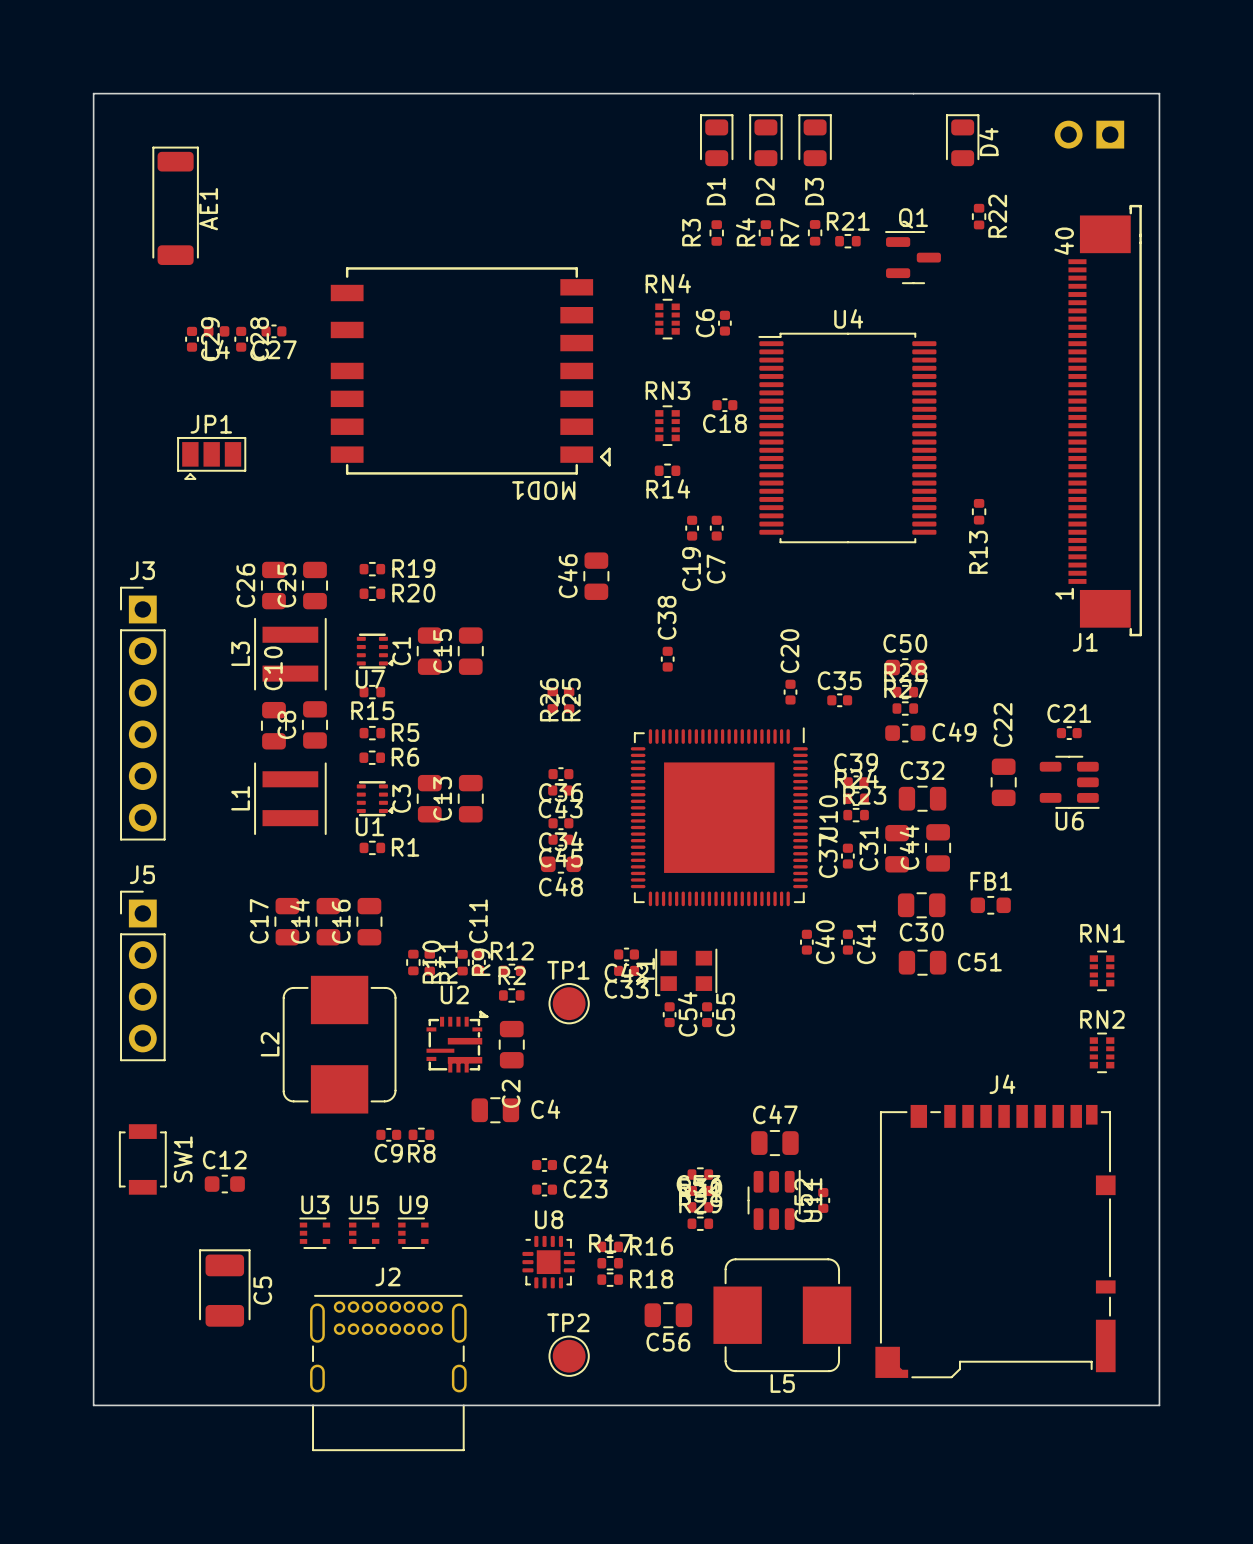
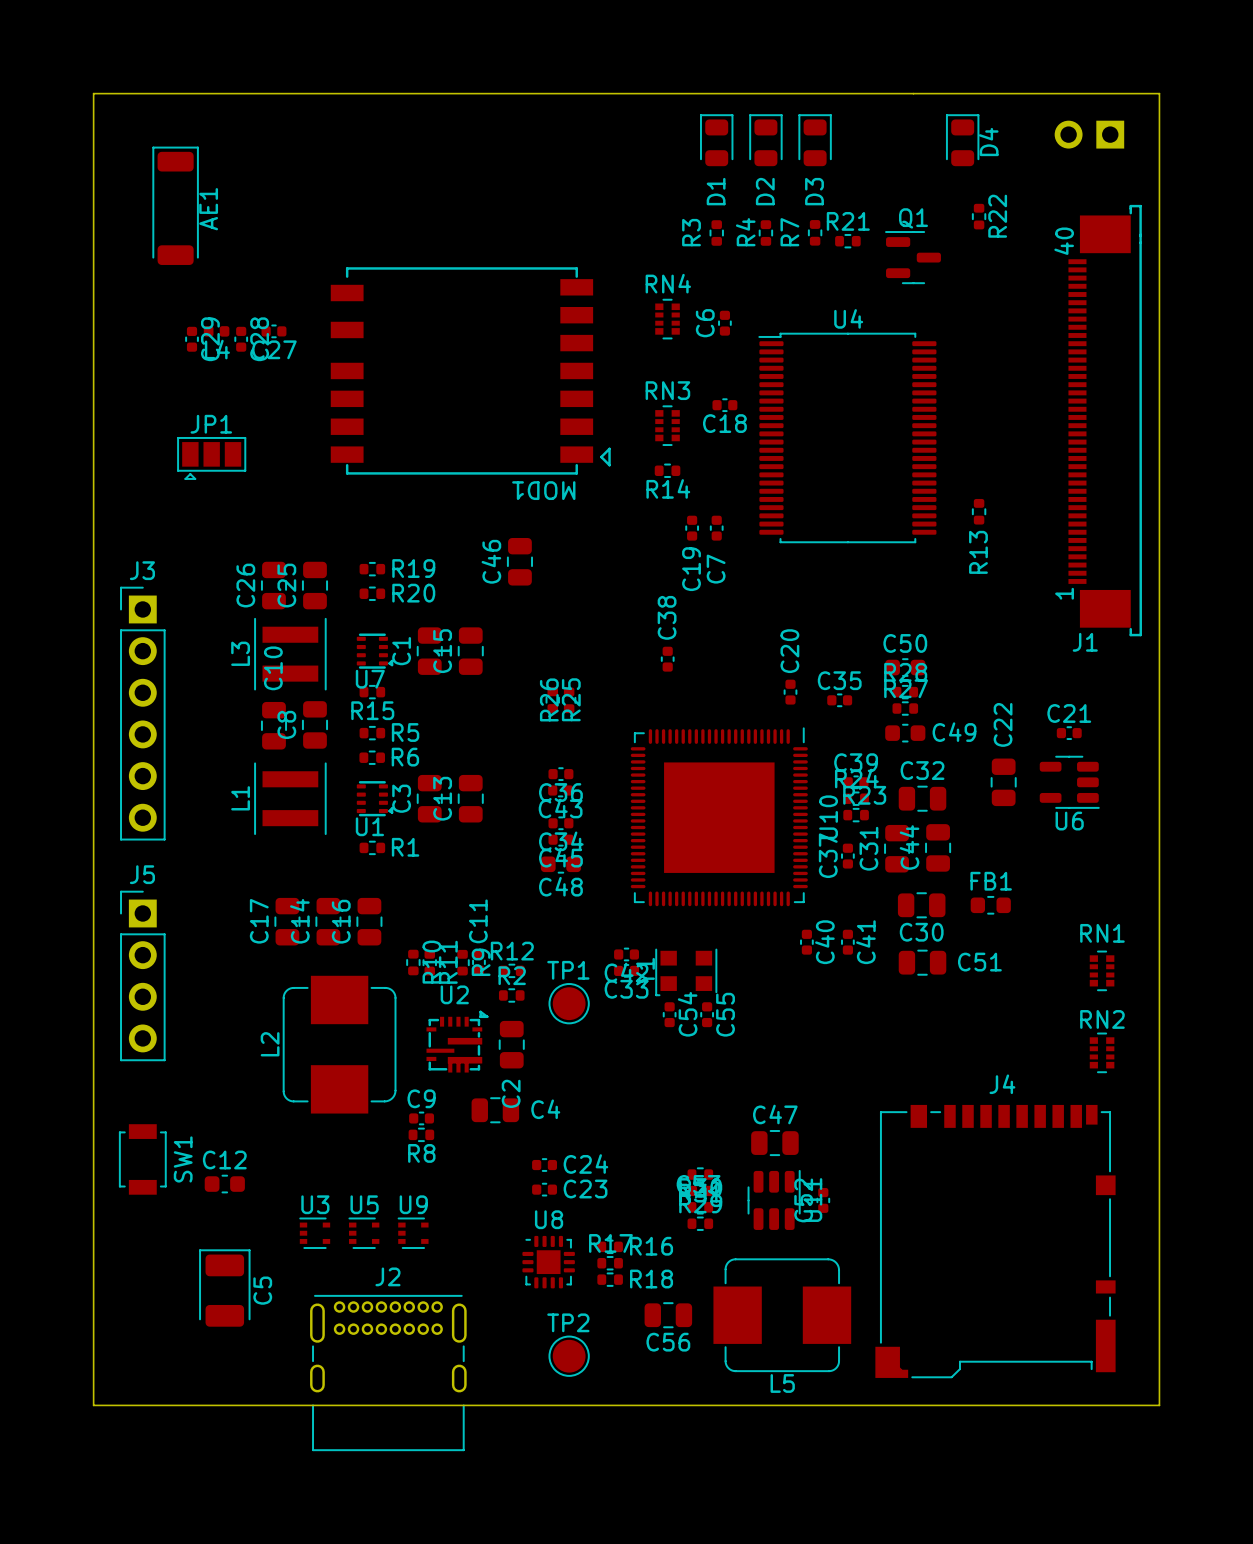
C46 position: (596, 576) -> (519, 561)
C9 position: (388, 1134) -> (421, 1118)
C9 name position: C9 (388, 1153) -> C9 (421, 1098)

